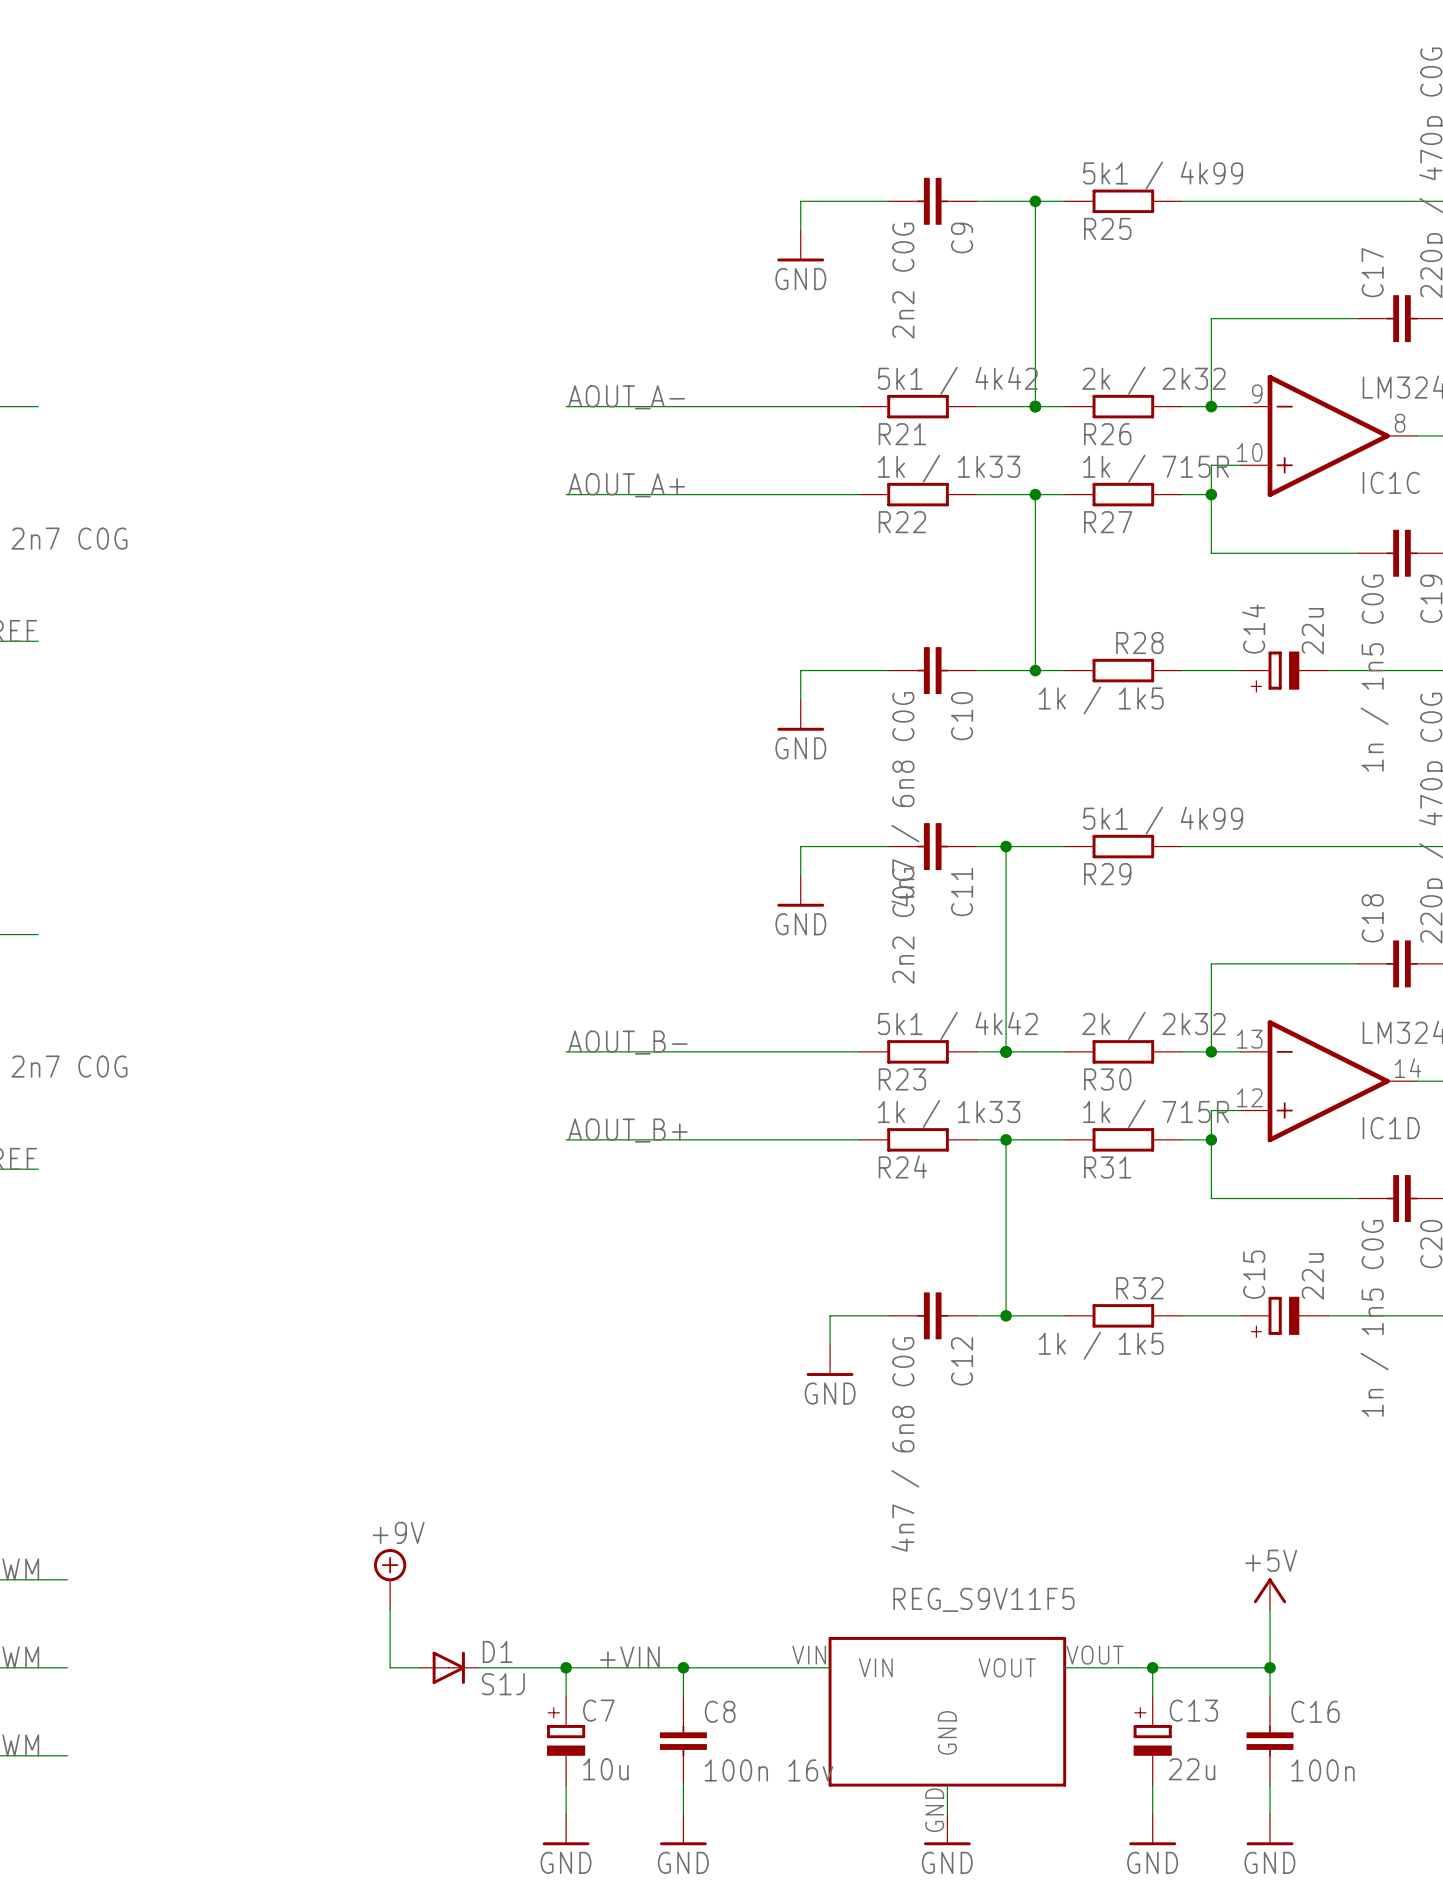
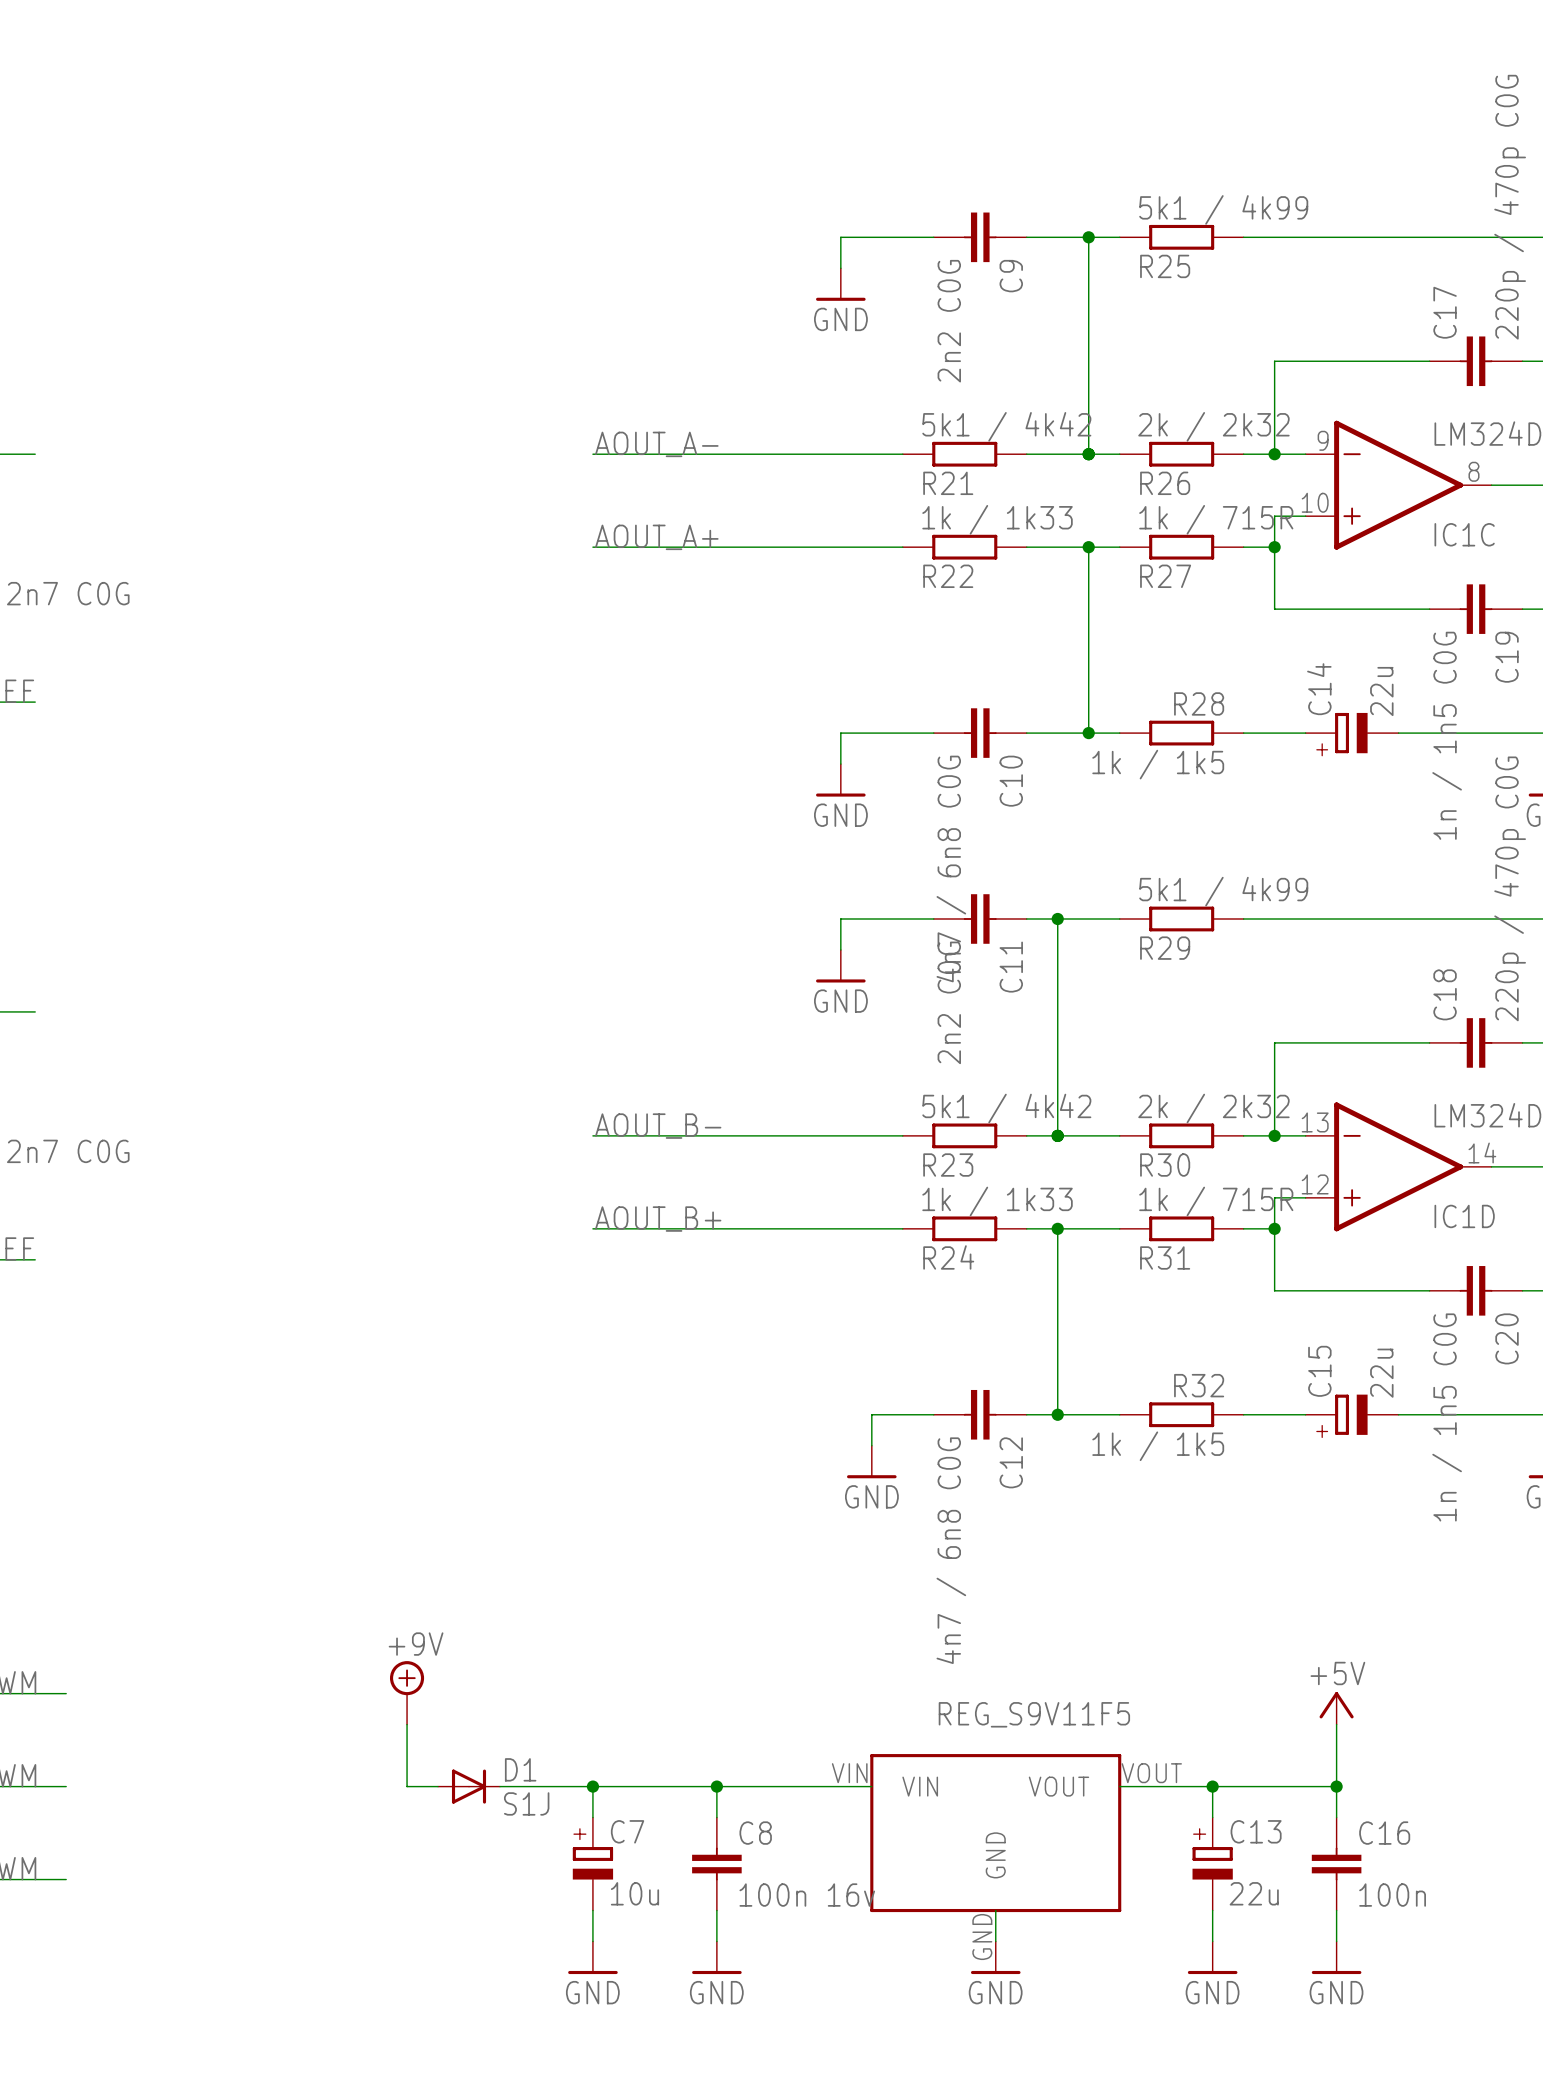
label: +VIN (629, 1657) -> none

